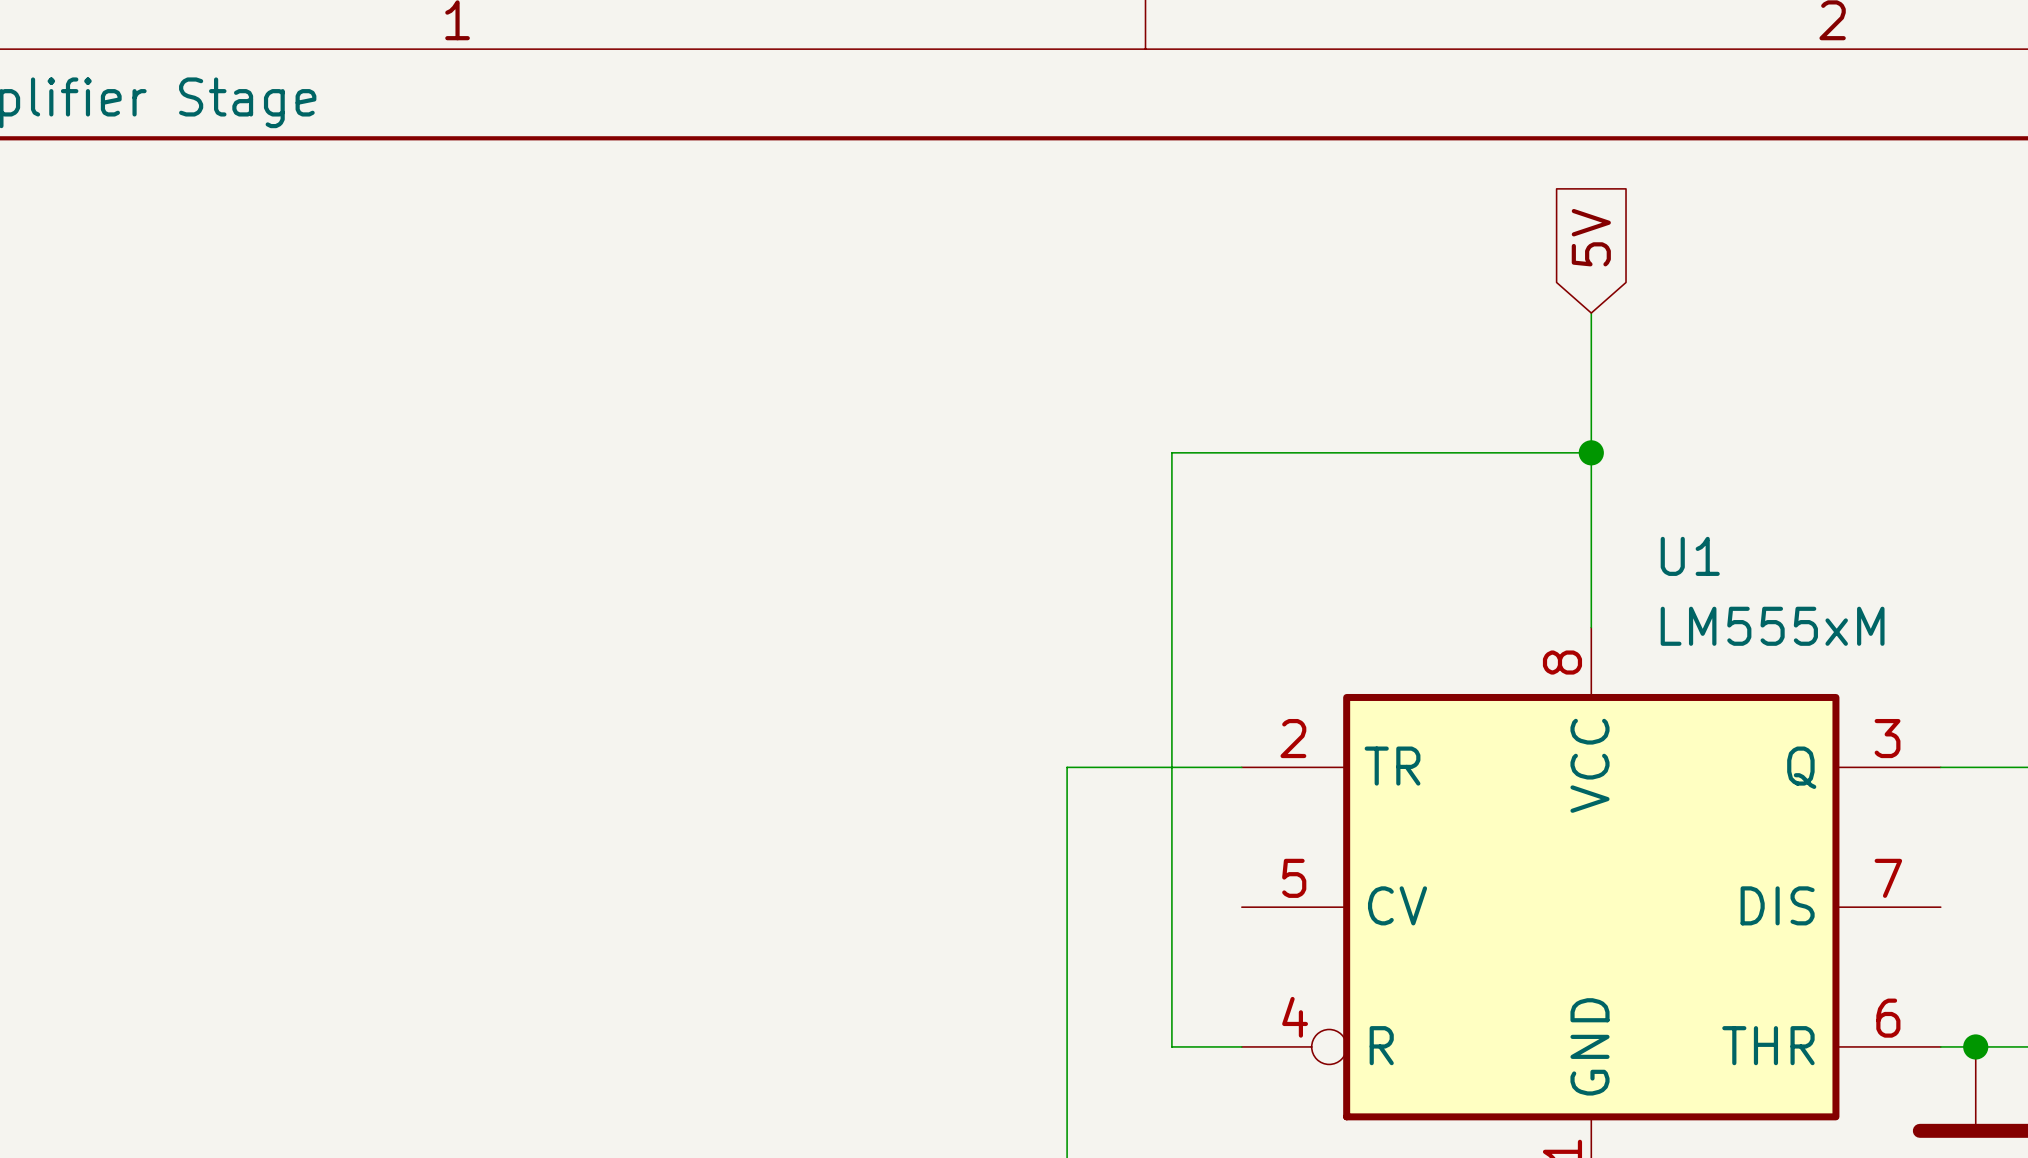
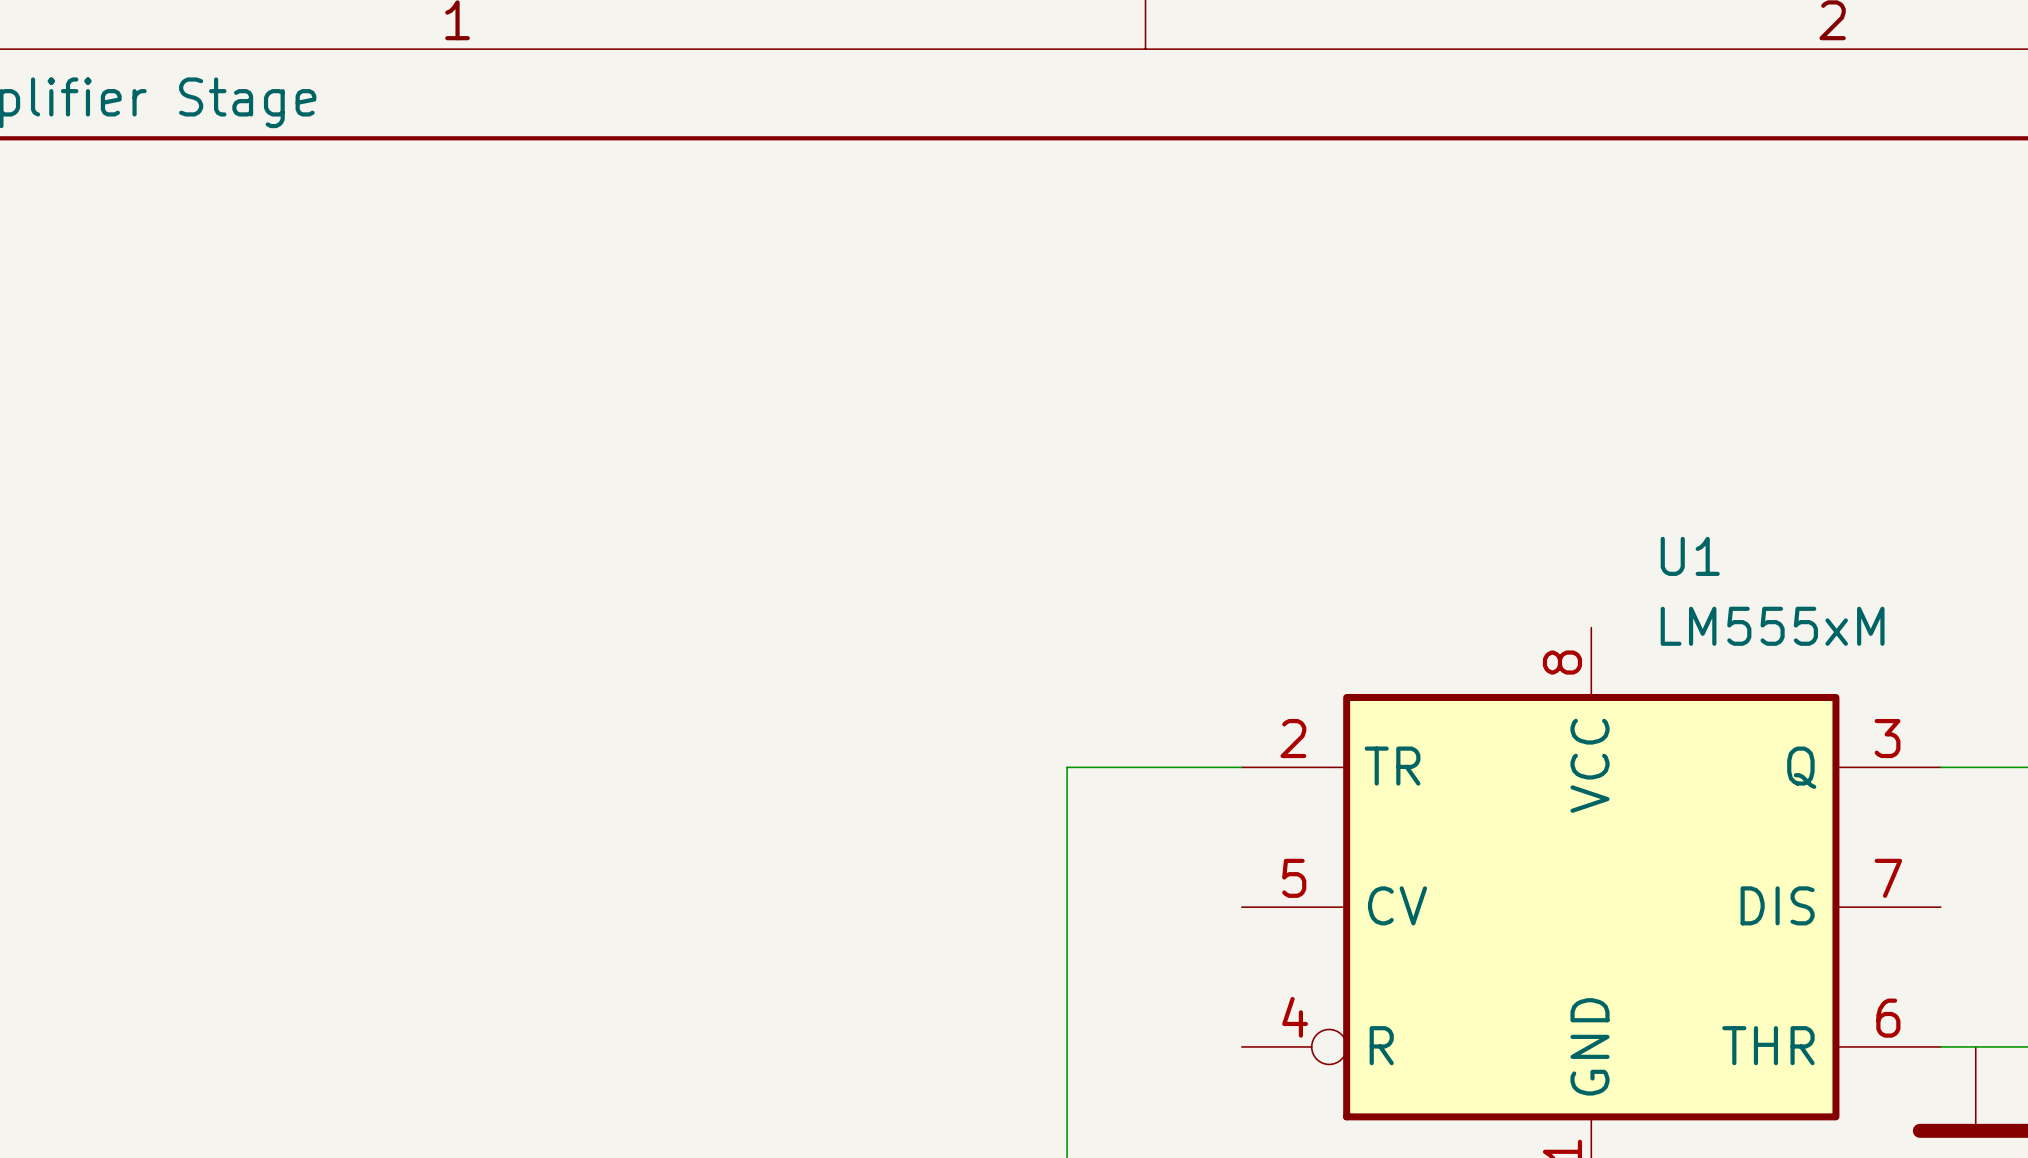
global label: 5V (1591, 237) -> none
wire: (1591, 313) (1591, 627) -> none
wire: (1591, 452) (1171, 452) (1171, 1046) (1241, 1046) -> none
junction: (1591, 452) -> none
junction: (1975, 1046) -> none

